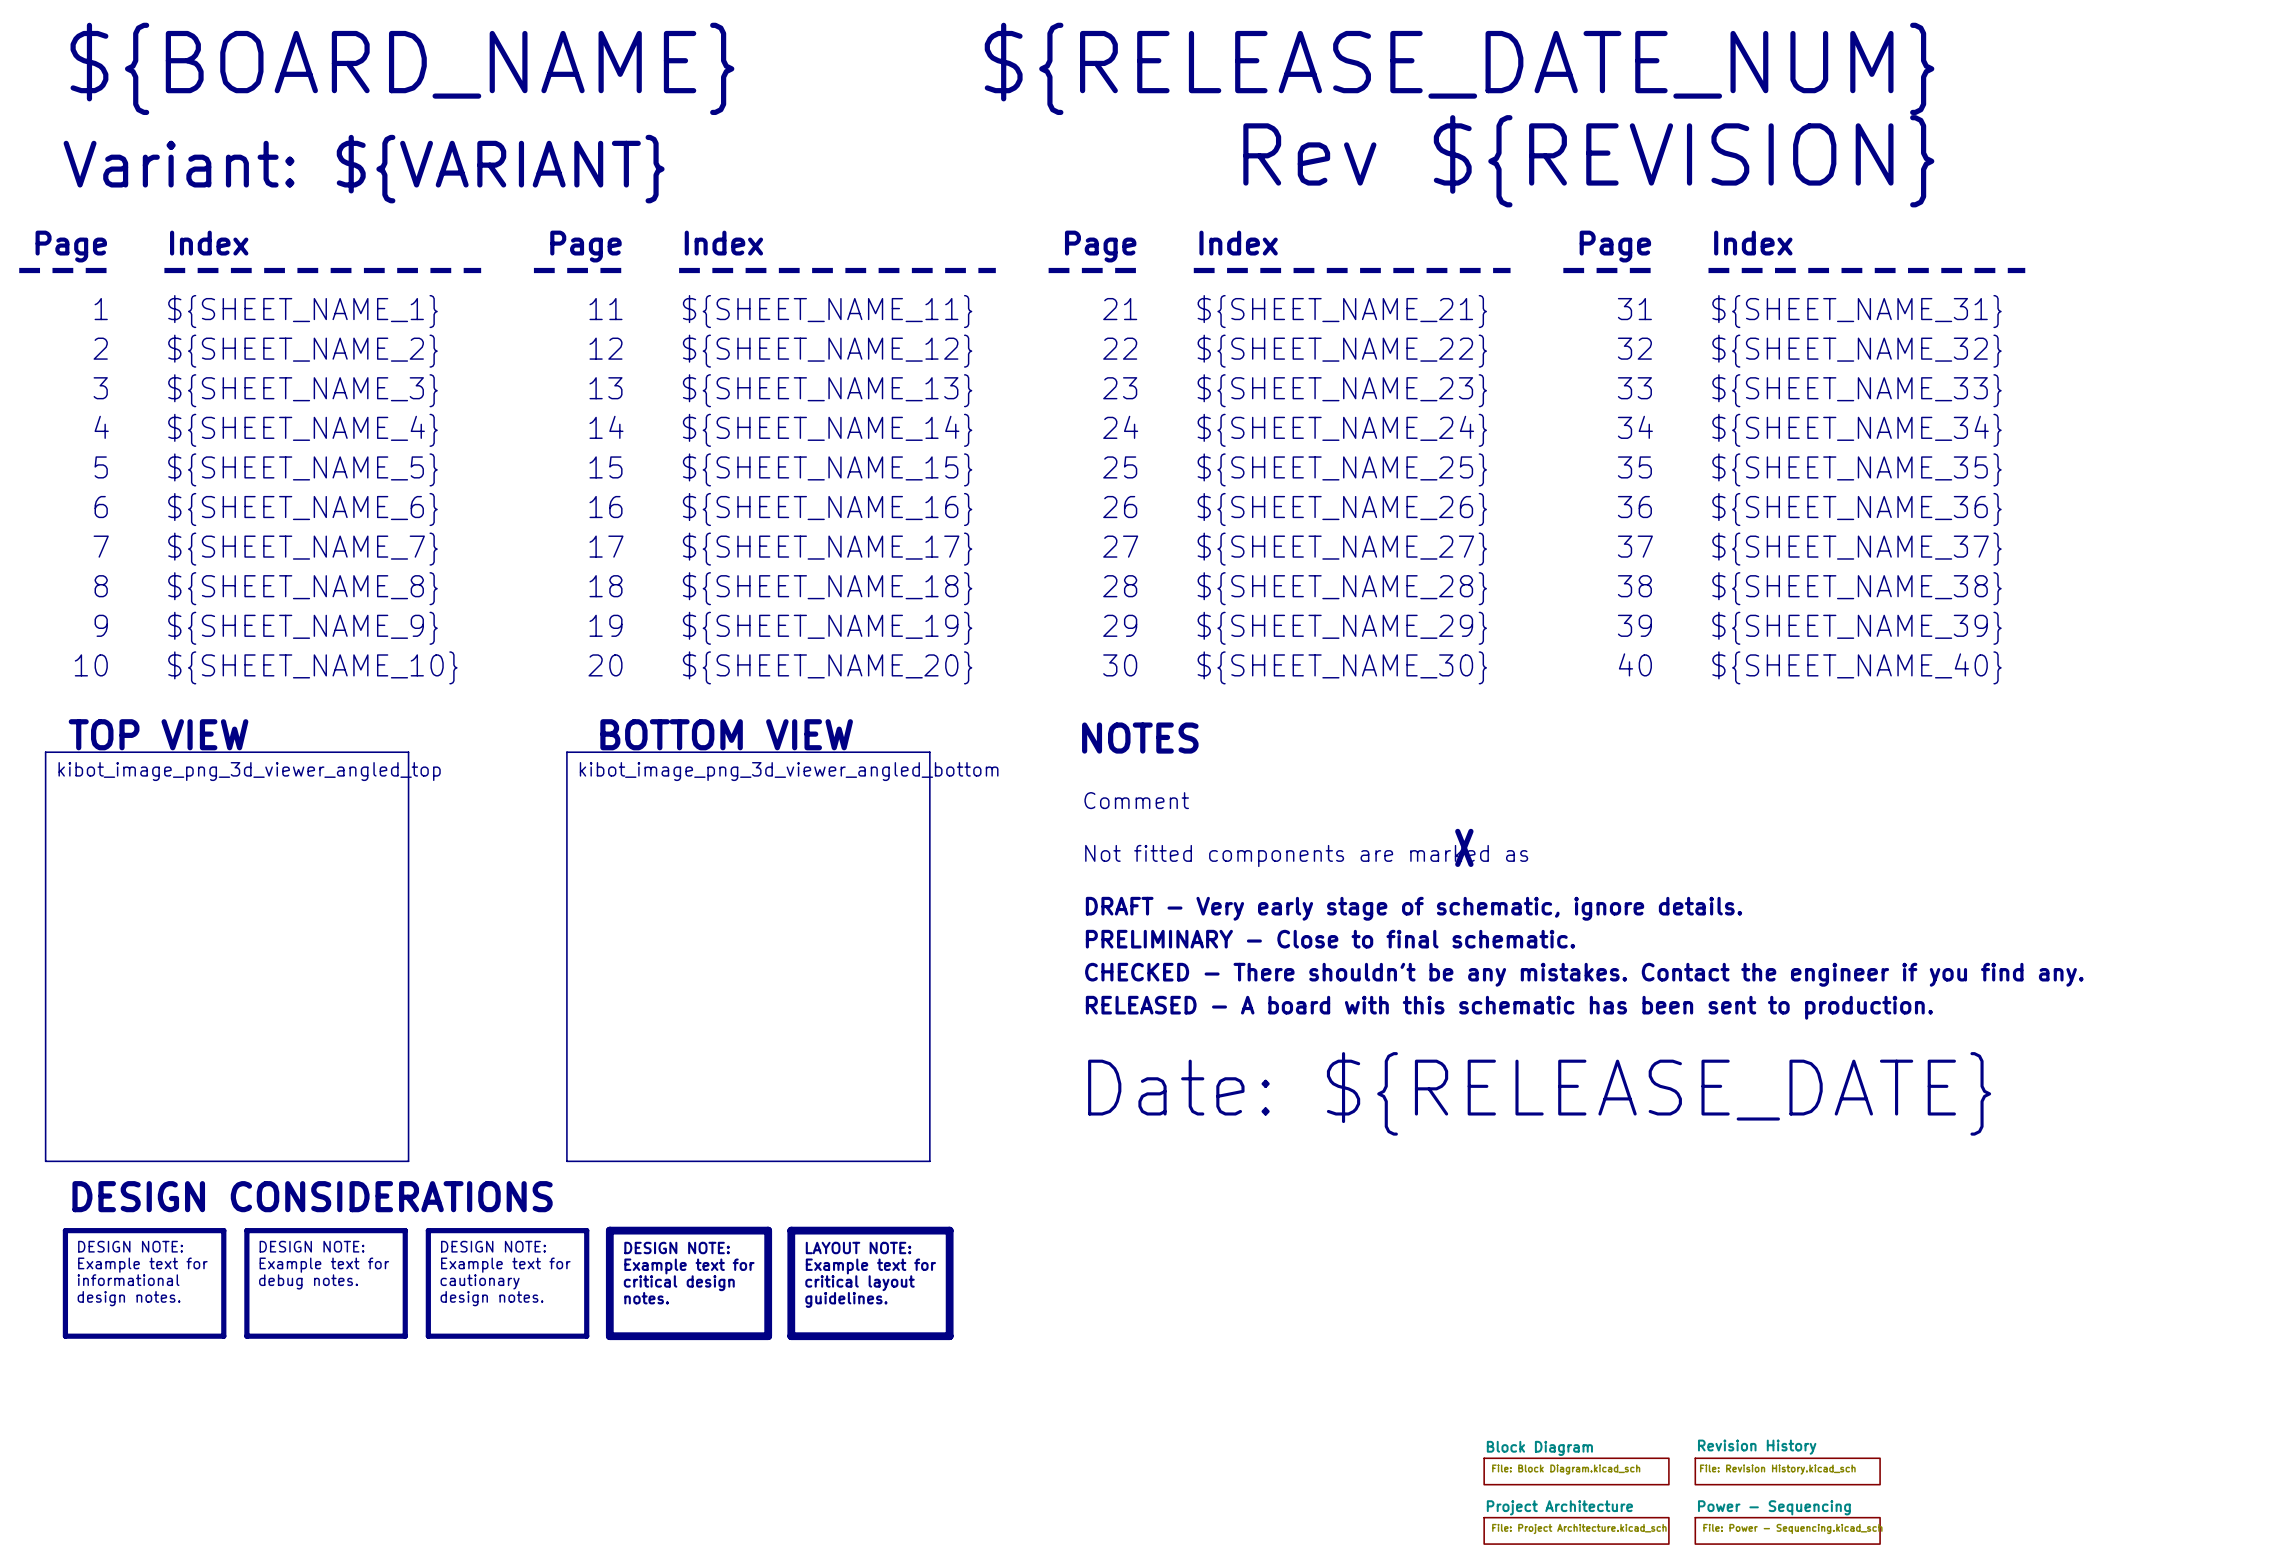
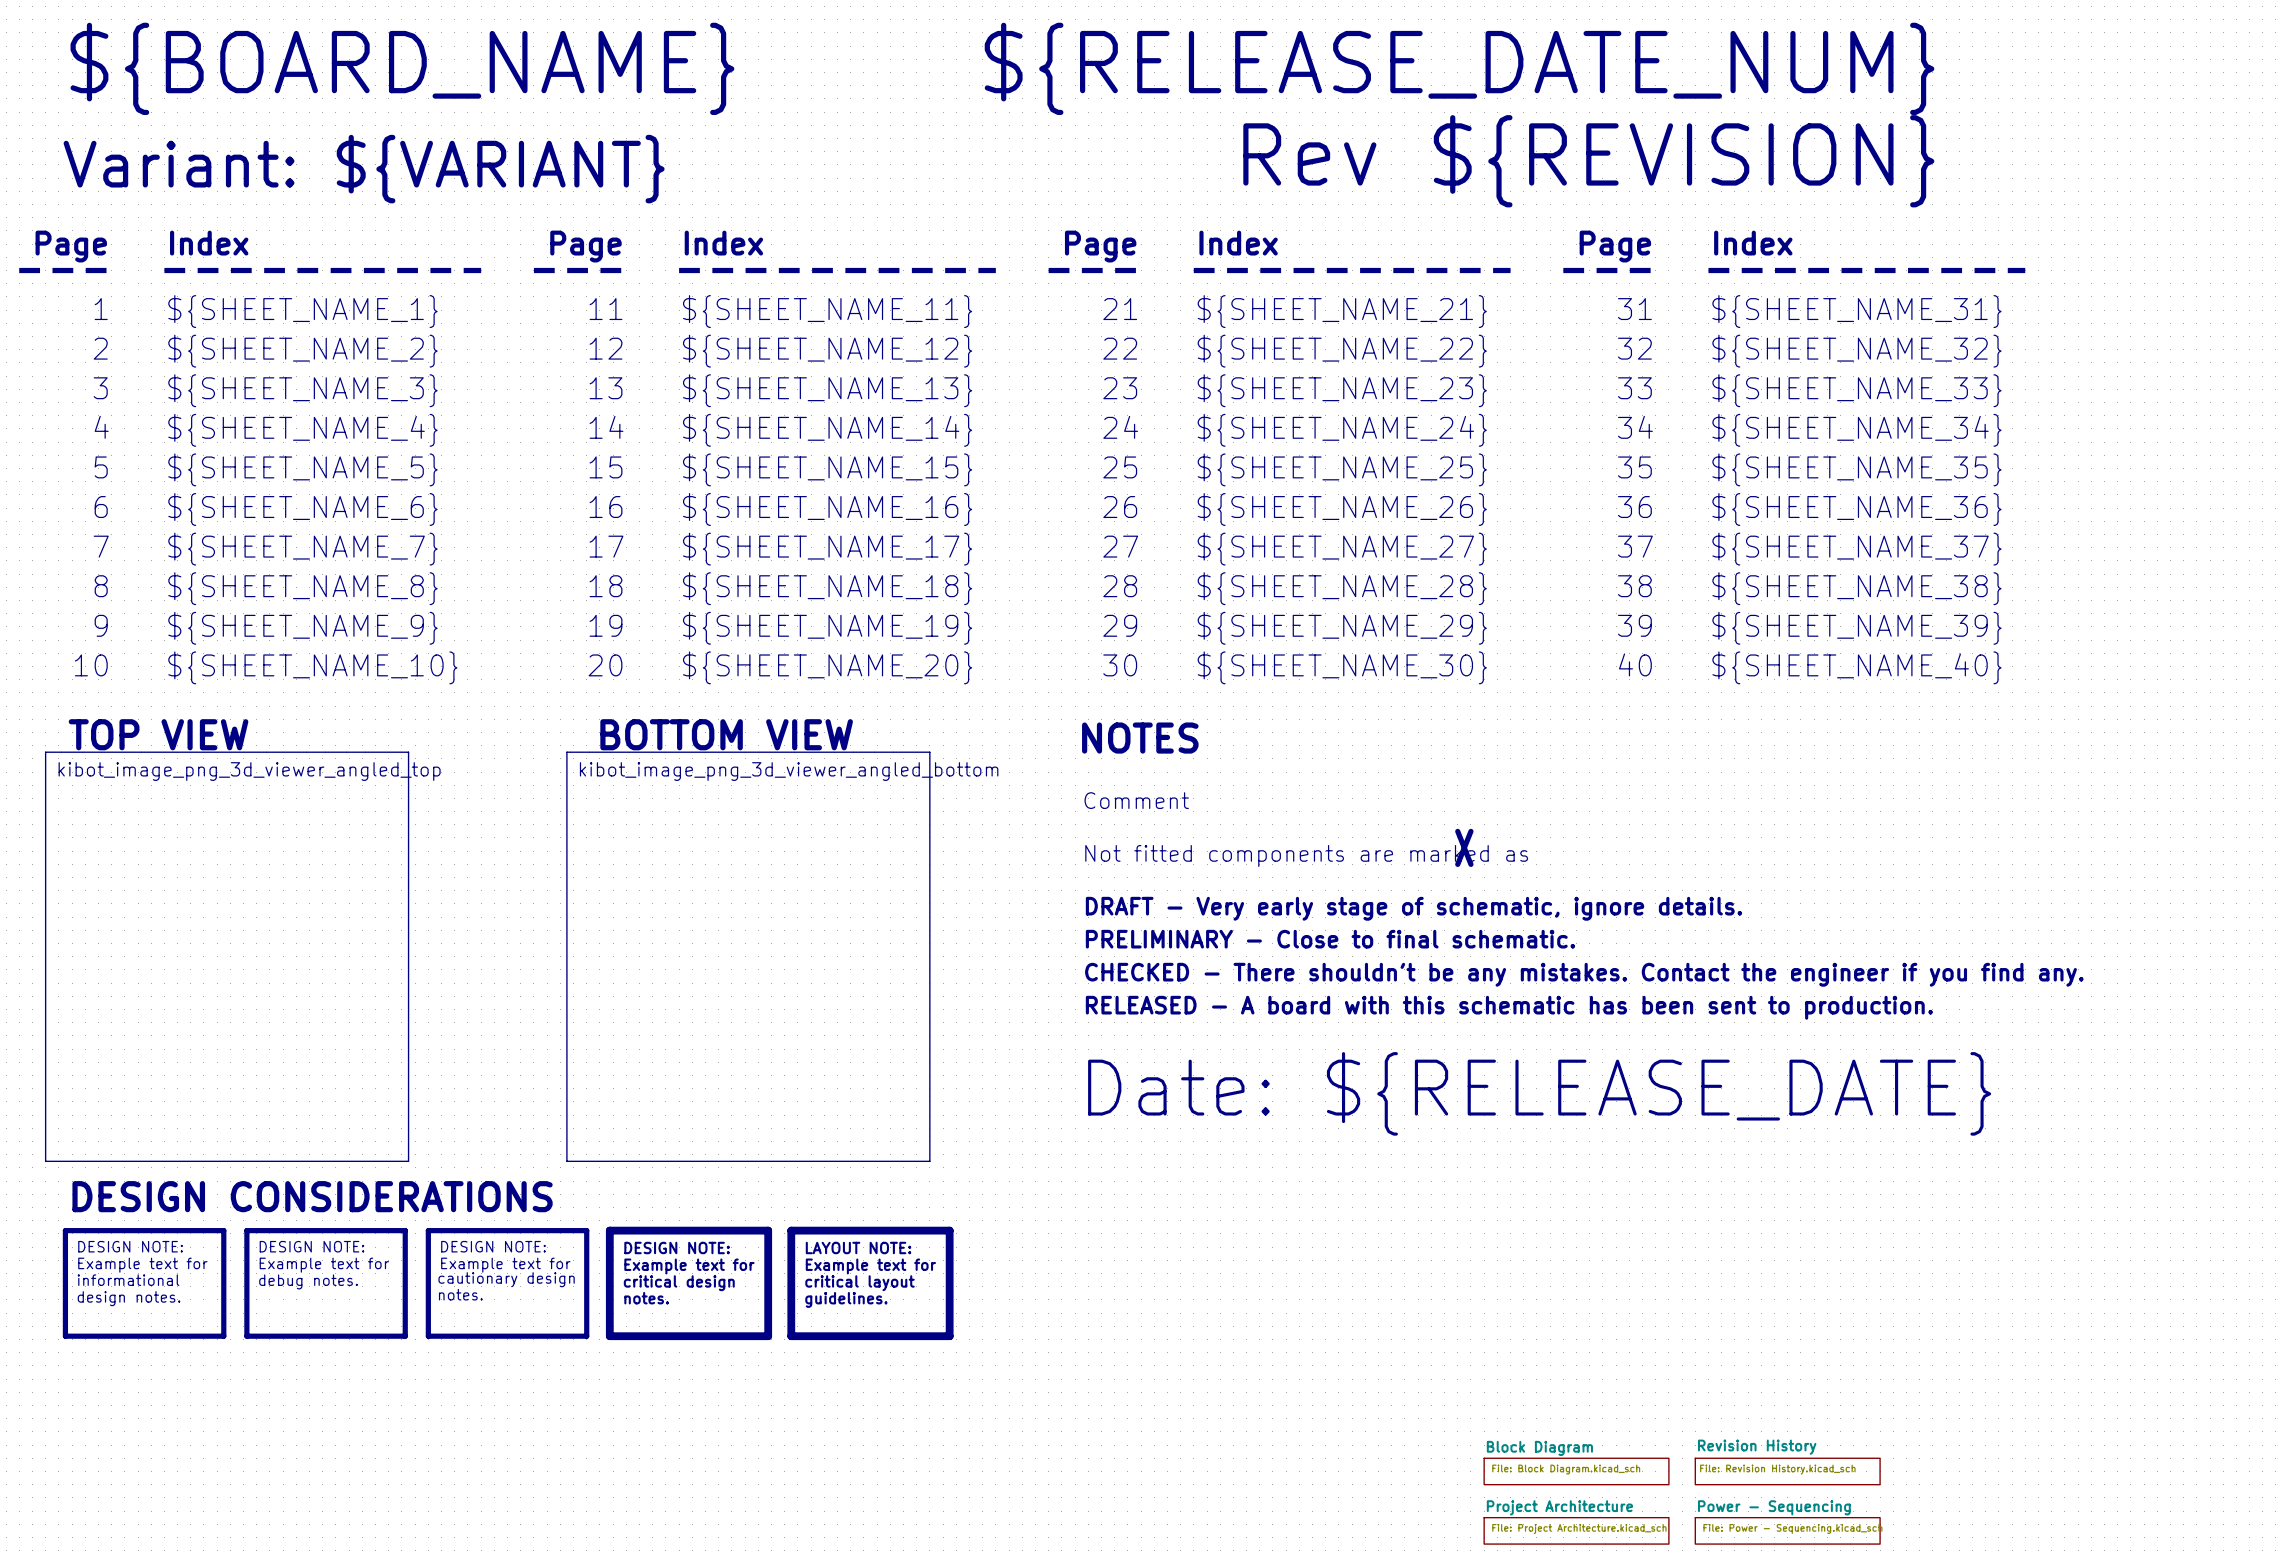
text: cautionary (480, 1281) -> cautionary design (506, 1279)
text: design notes. (491, 1298) -> notes. (460, 1294)

